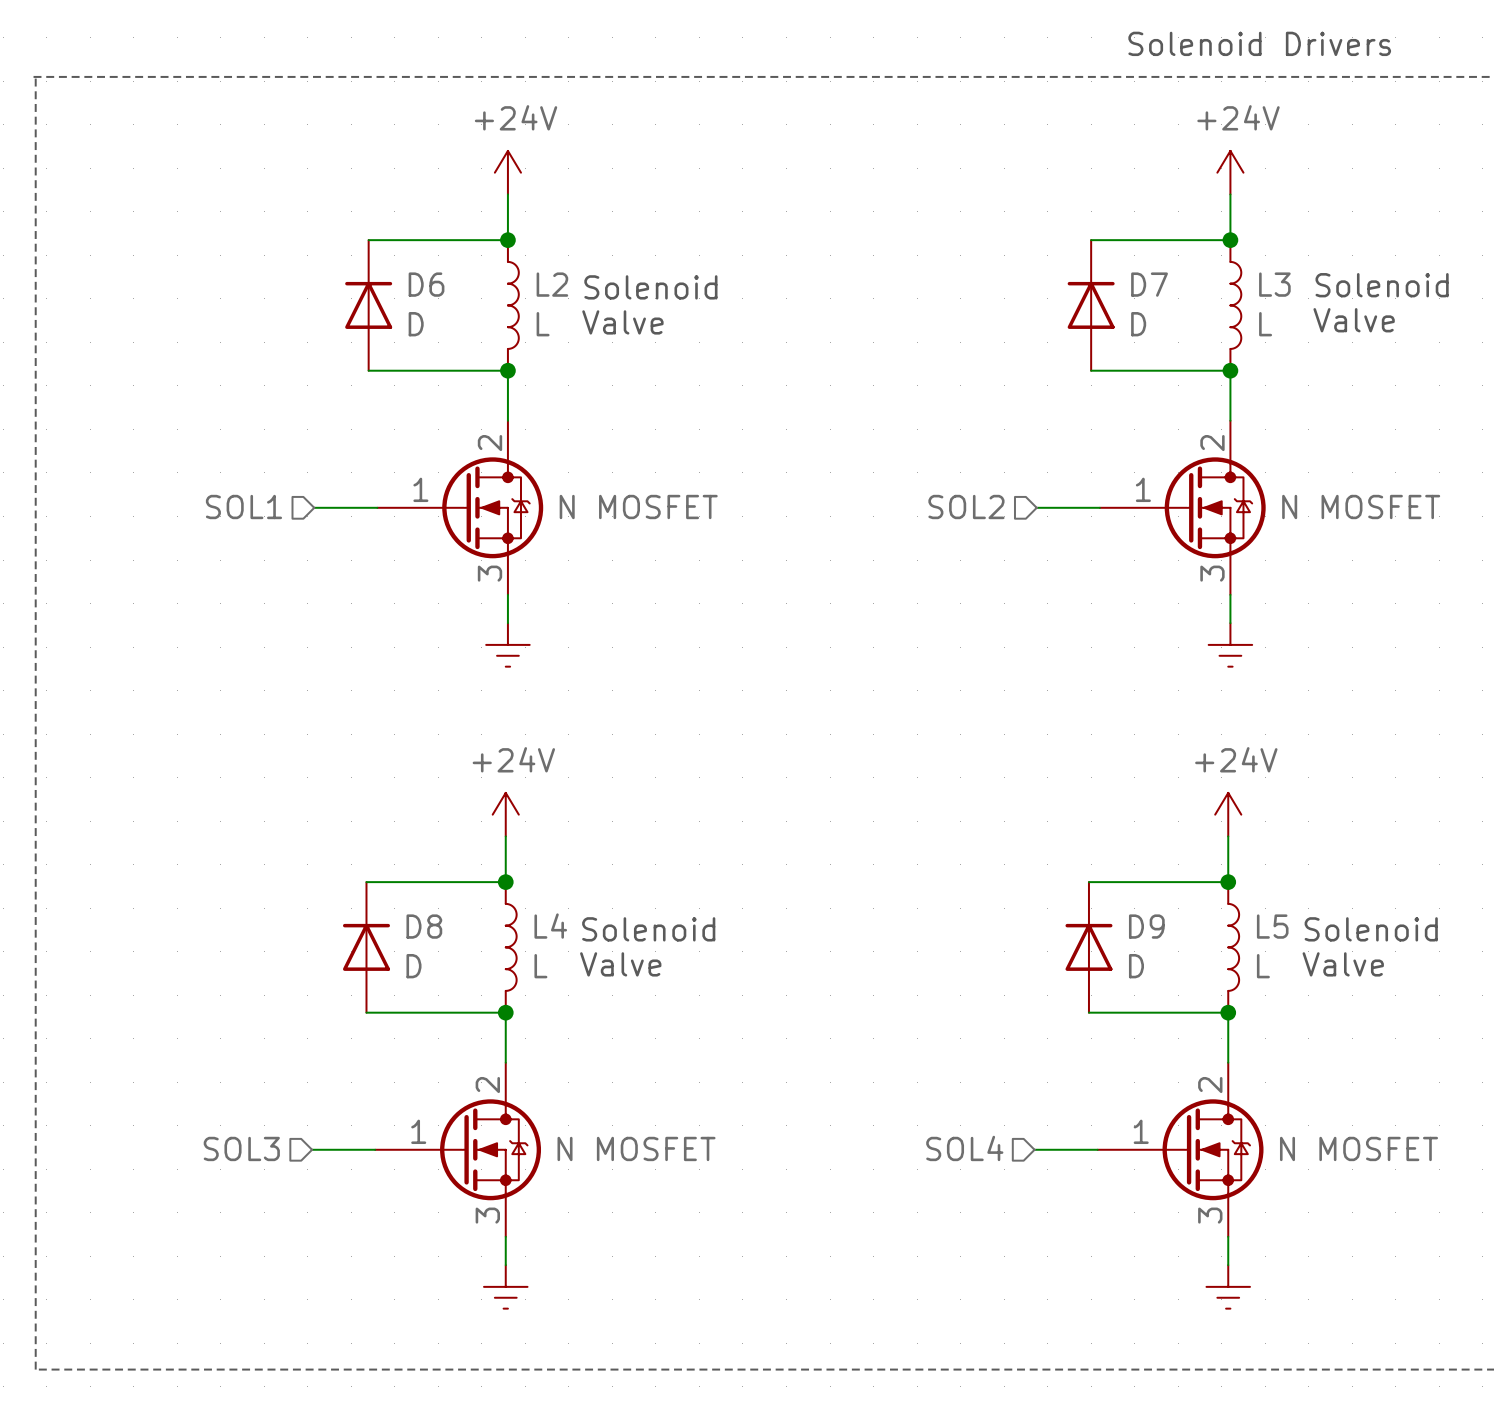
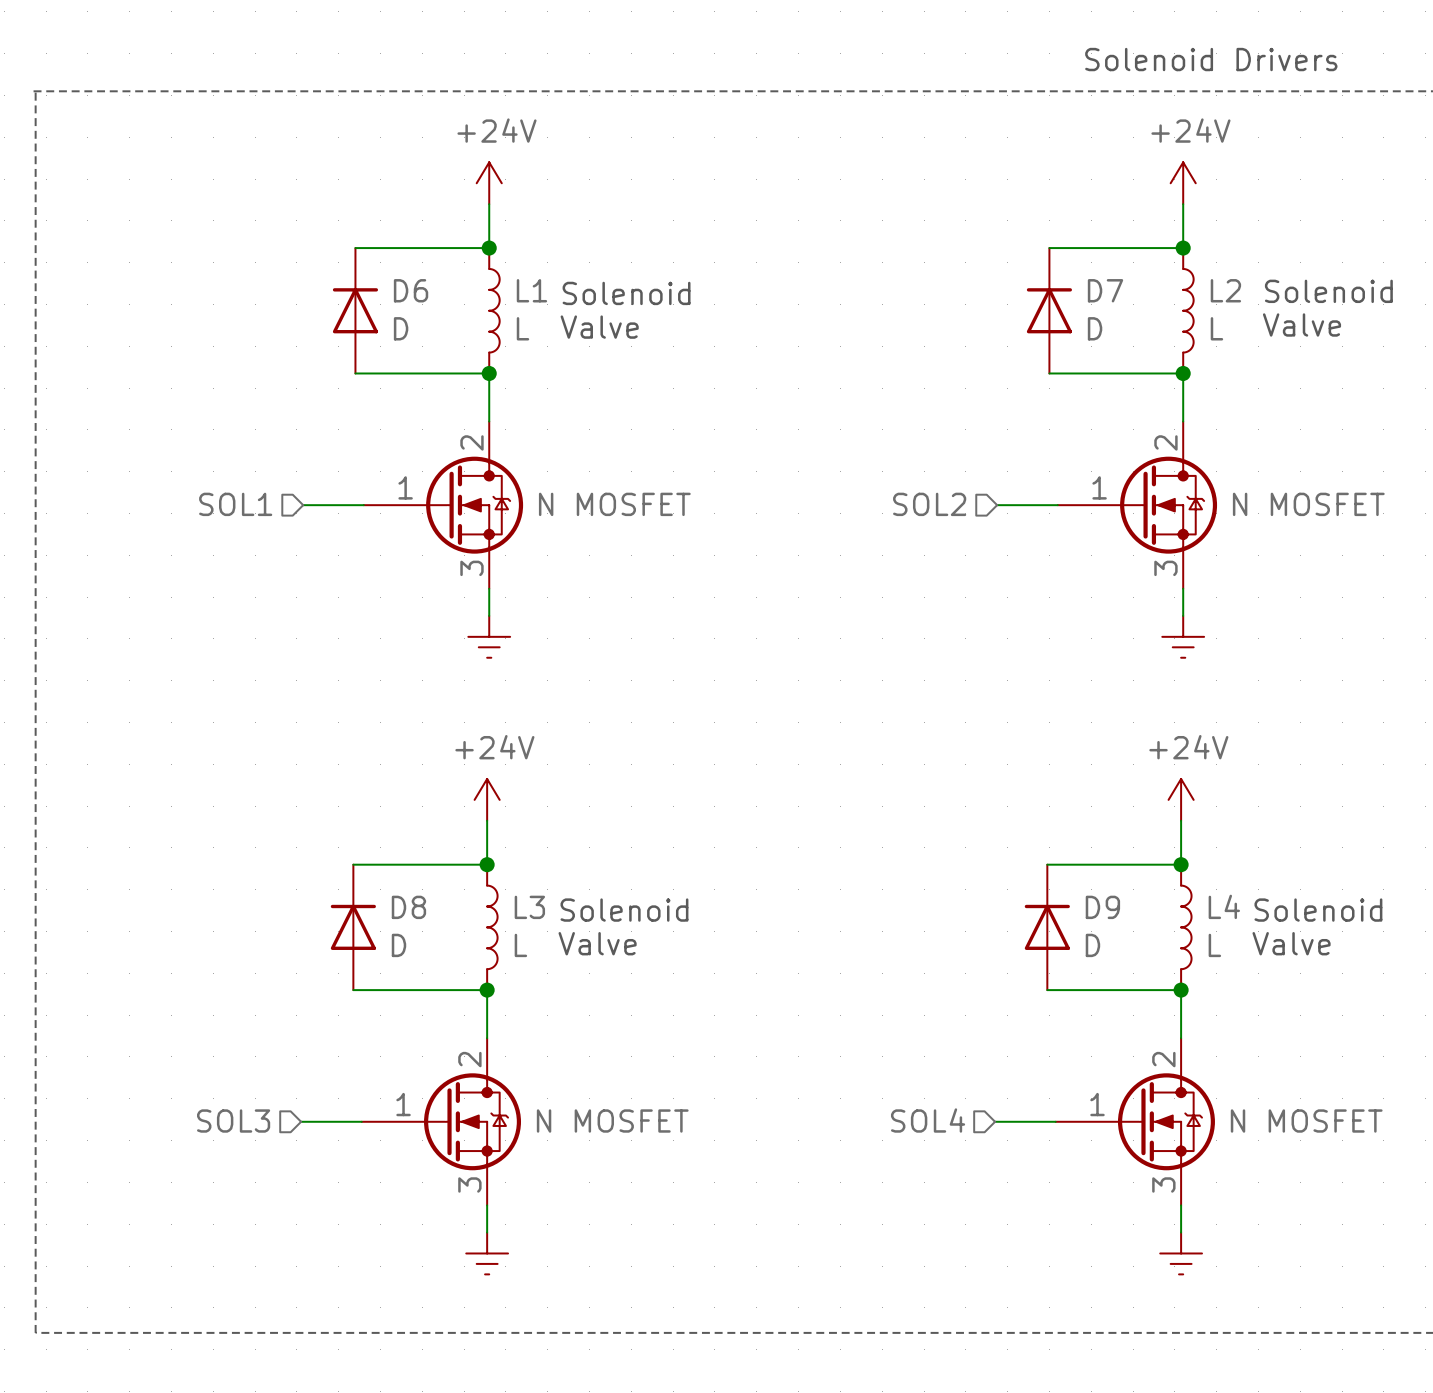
L2 name: L2 (552, 284) -> L1 (531, 290)
L3 name: L3 (1274, 284) -> L2 (1225, 290)
L4 name: L4 (550, 926) -> L3 (529, 907)
L5 name: L5 (1272, 926) -> L4 (1224, 906)

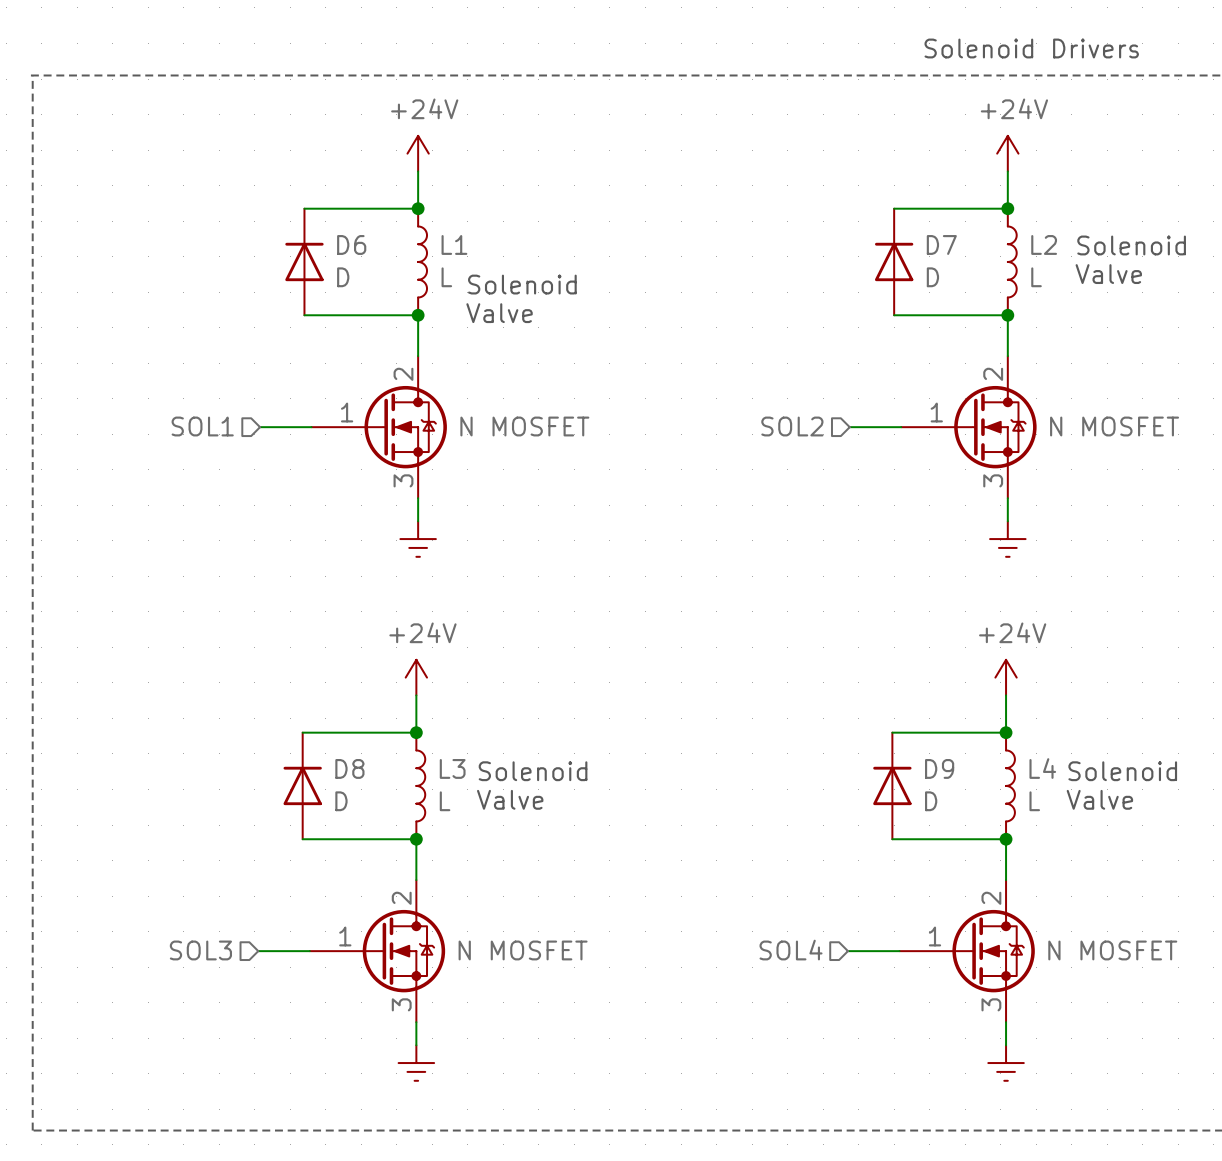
text position: Solenoid (626, 293) -> Solenoid (522, 284)
text position: Valve (599, 327) -> Valve (499, 313)

